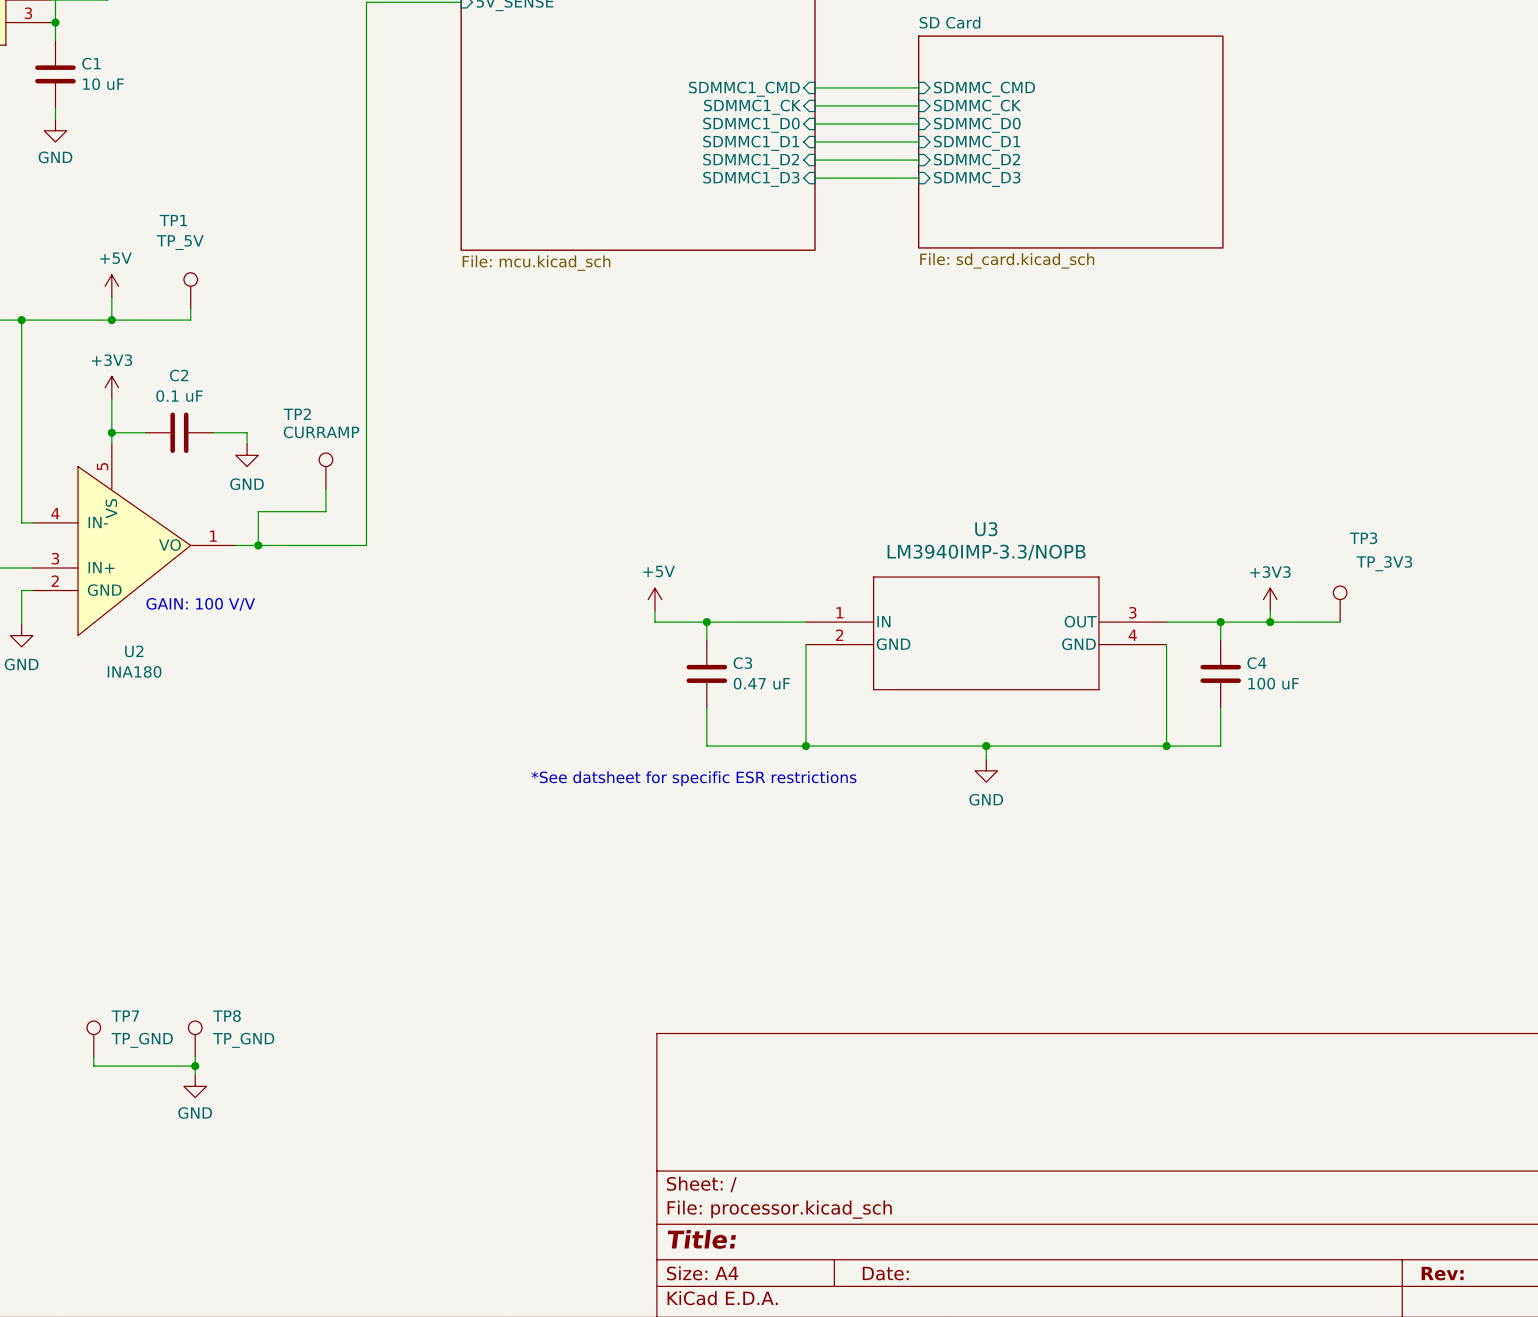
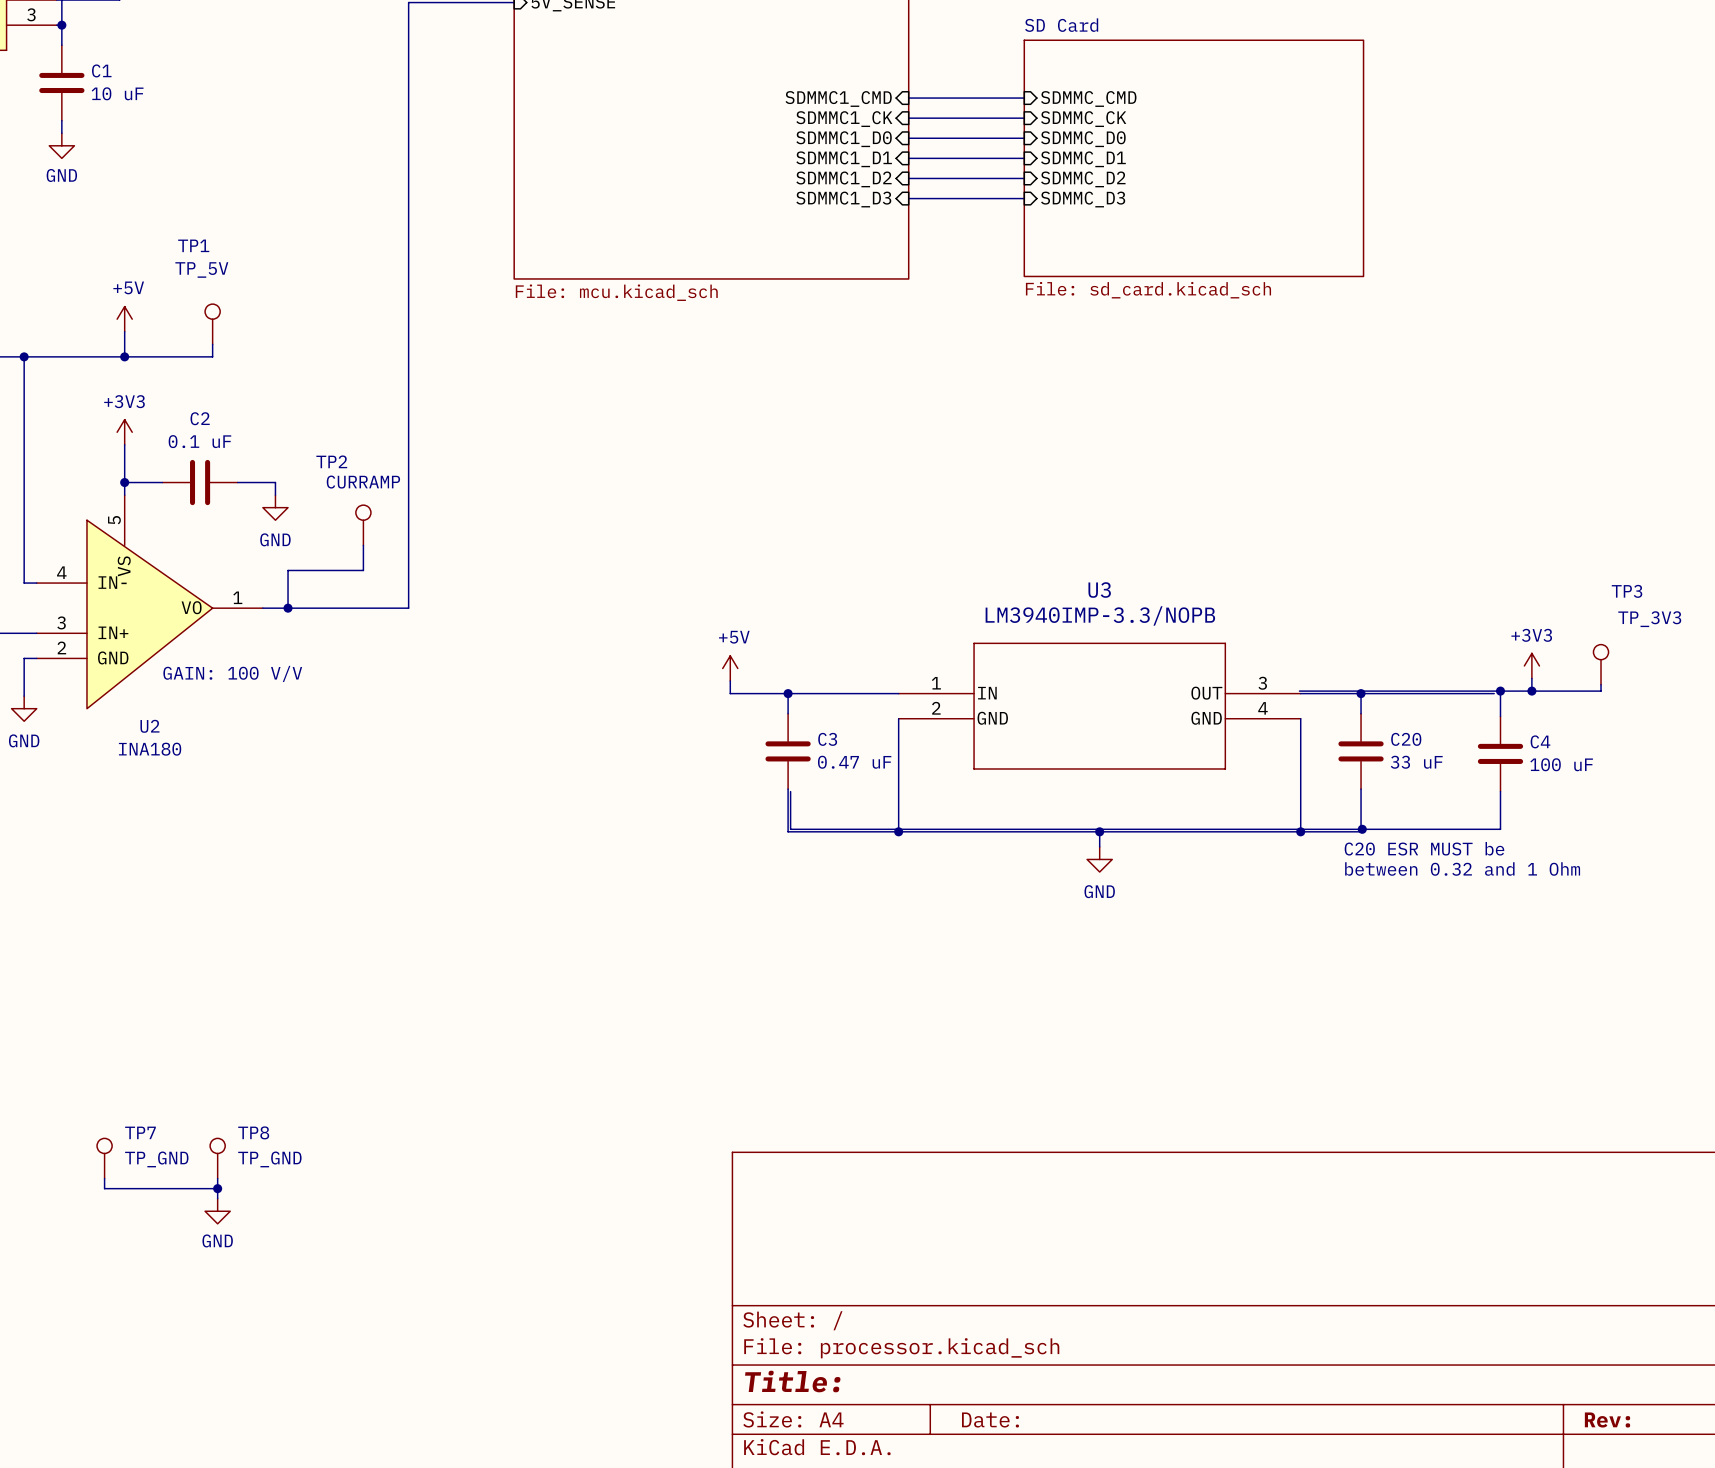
power symbol position: +3V3 (1270, 599) -> +3V3 (1531, 665)
TP3 position: (1340, 604) -> (1601, 664)
wire: (1270, 610) (1270, 622) -> (1531, 678) (1531, 691)
wire: none -> (1601, 684) (1601, 691) (1299, 691)
wire: none -> (1500, 691) (1500, 716)
junction: none -> (1500, 691)
junction: none -> (1531, 691)
junction: (1270, 622) -> none
C4 name: C4 (1256, 663) -> C20 (1406, 739)
C4: none -> 100 uF (1500, 753)
C4 value: 100 uF (1273, 683) -> 33 uF (1416, 762)
wire: none -> (790, 791) (790, 829) (1500, 829) (1500, 791)
junction: none -> (1362, 829)
text: none -> C20 ESR MUST be (1424, 848)
text: *See datsheet for specific ESR restrictions (693, 778) -> none
text: none -> between 0.32 and 1 Ohm (1462, 869)

